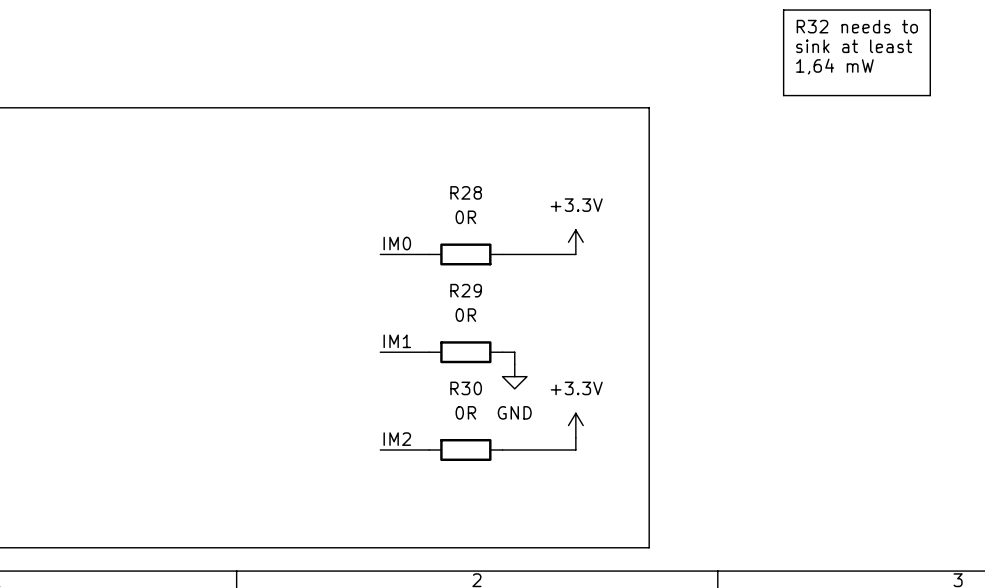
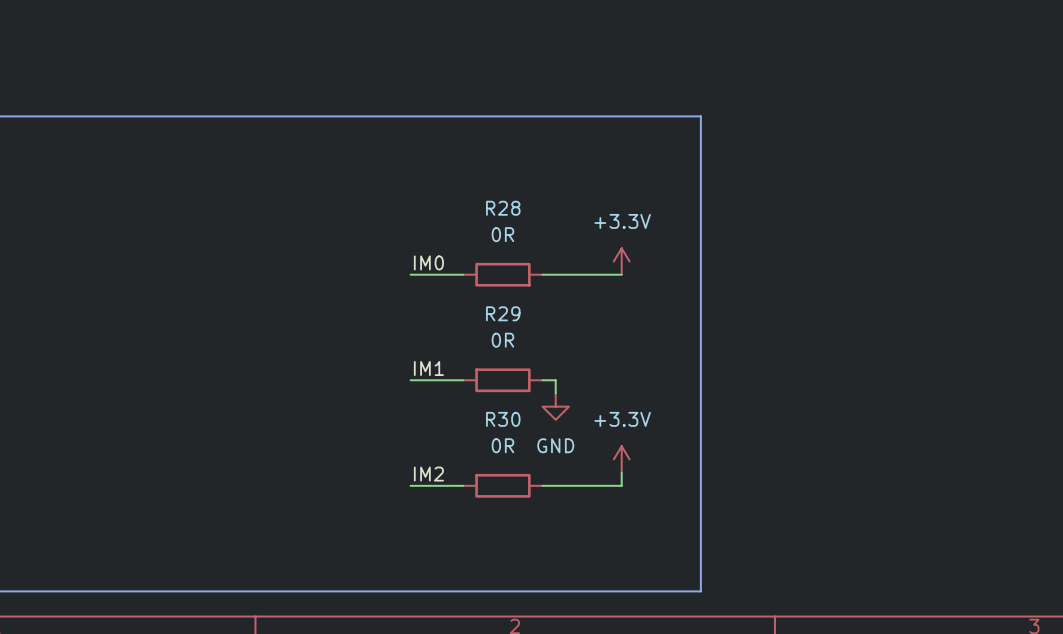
line: (783, 10) (930, 10) (930, 95) (783, 95) (783, 10) -> none
text: R32 needs to (857, 26) -> none
text: sink at least (854, 46) -> none
text: 1,64 mW (834, 66) -> none

